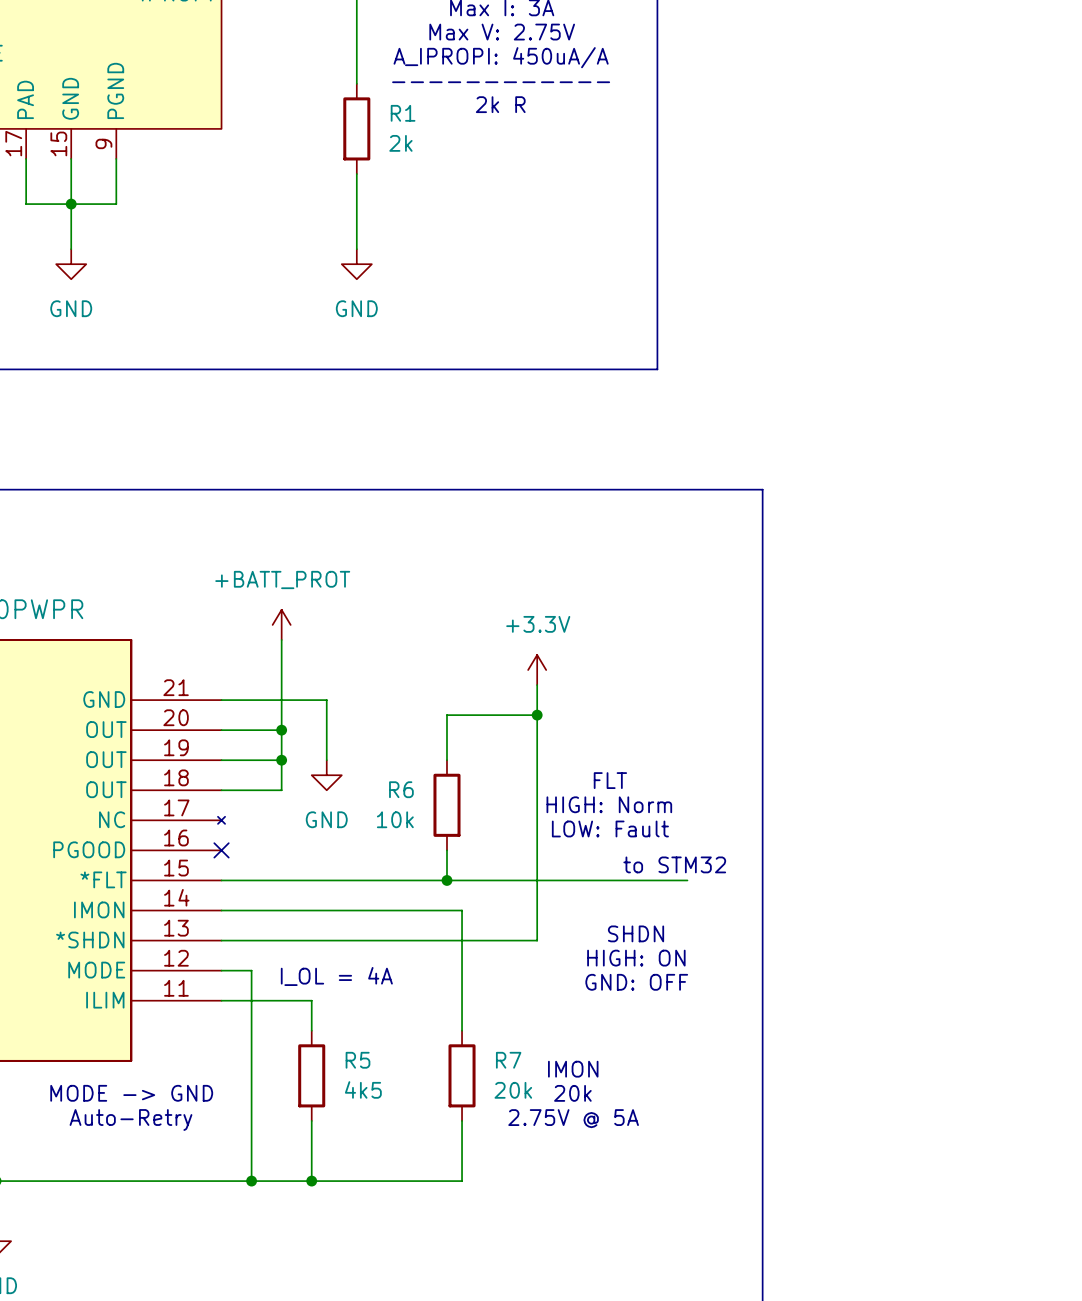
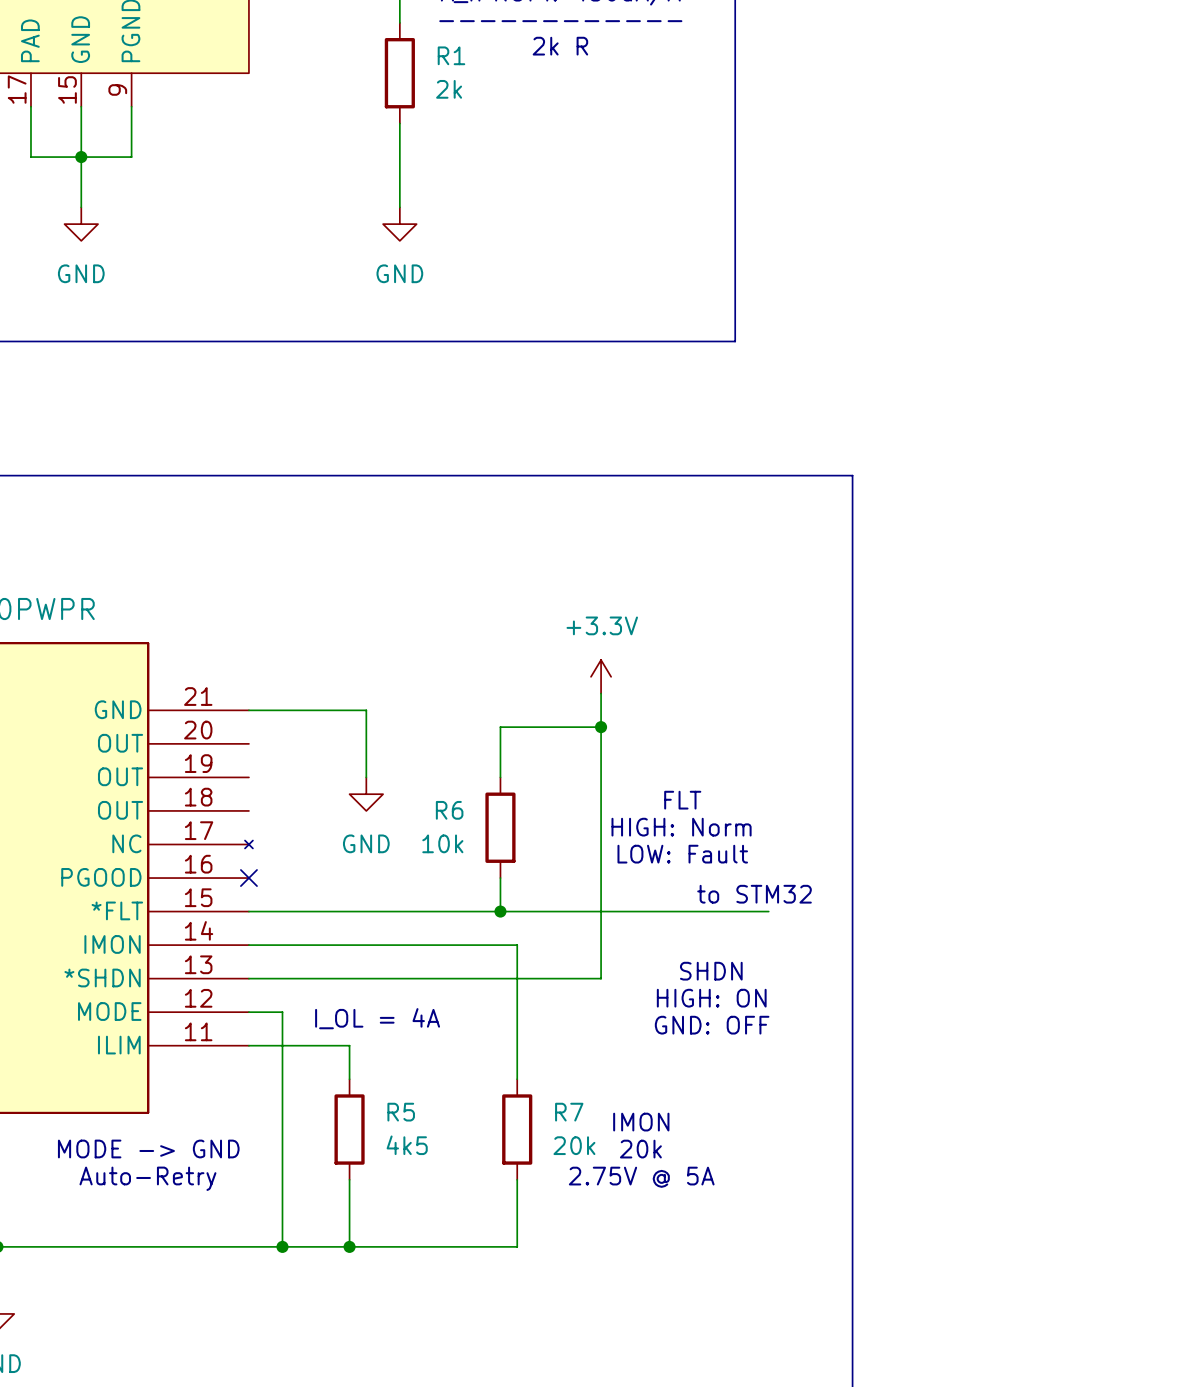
power symbol: +BATT_PROT (281, 624) -> none
wire: (281, 639) (281, 790) (221, 790) -> none
wire: (221, 730) (281, 730) -> none
junction: (281, 730) -> none
wire: (221, 760) (281, 760) -> none
junction: (281, 760) -> none

